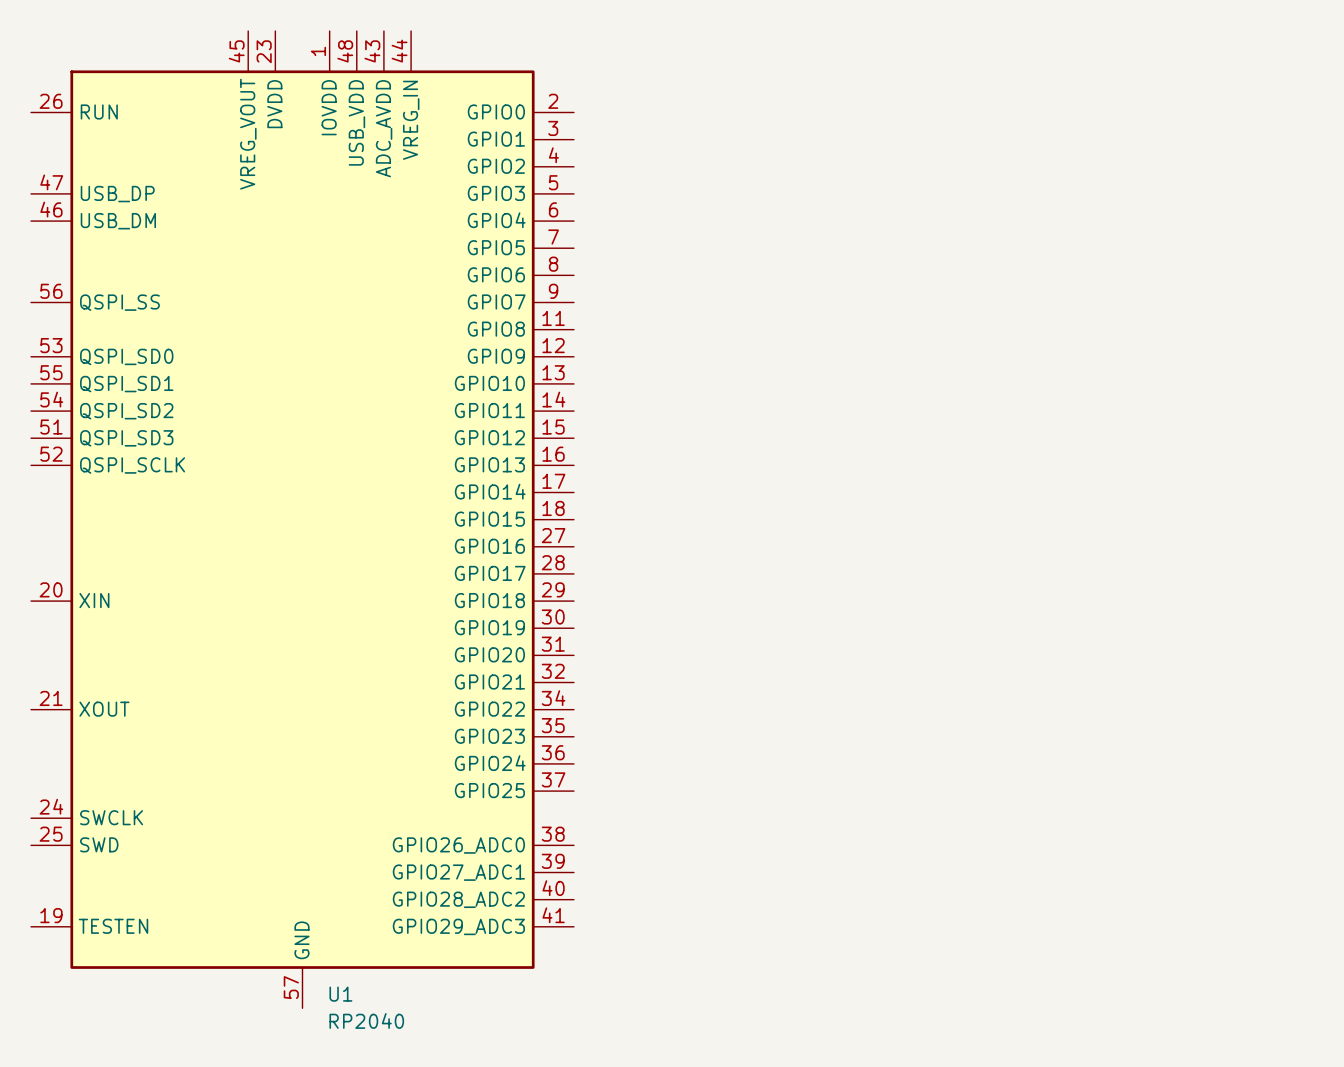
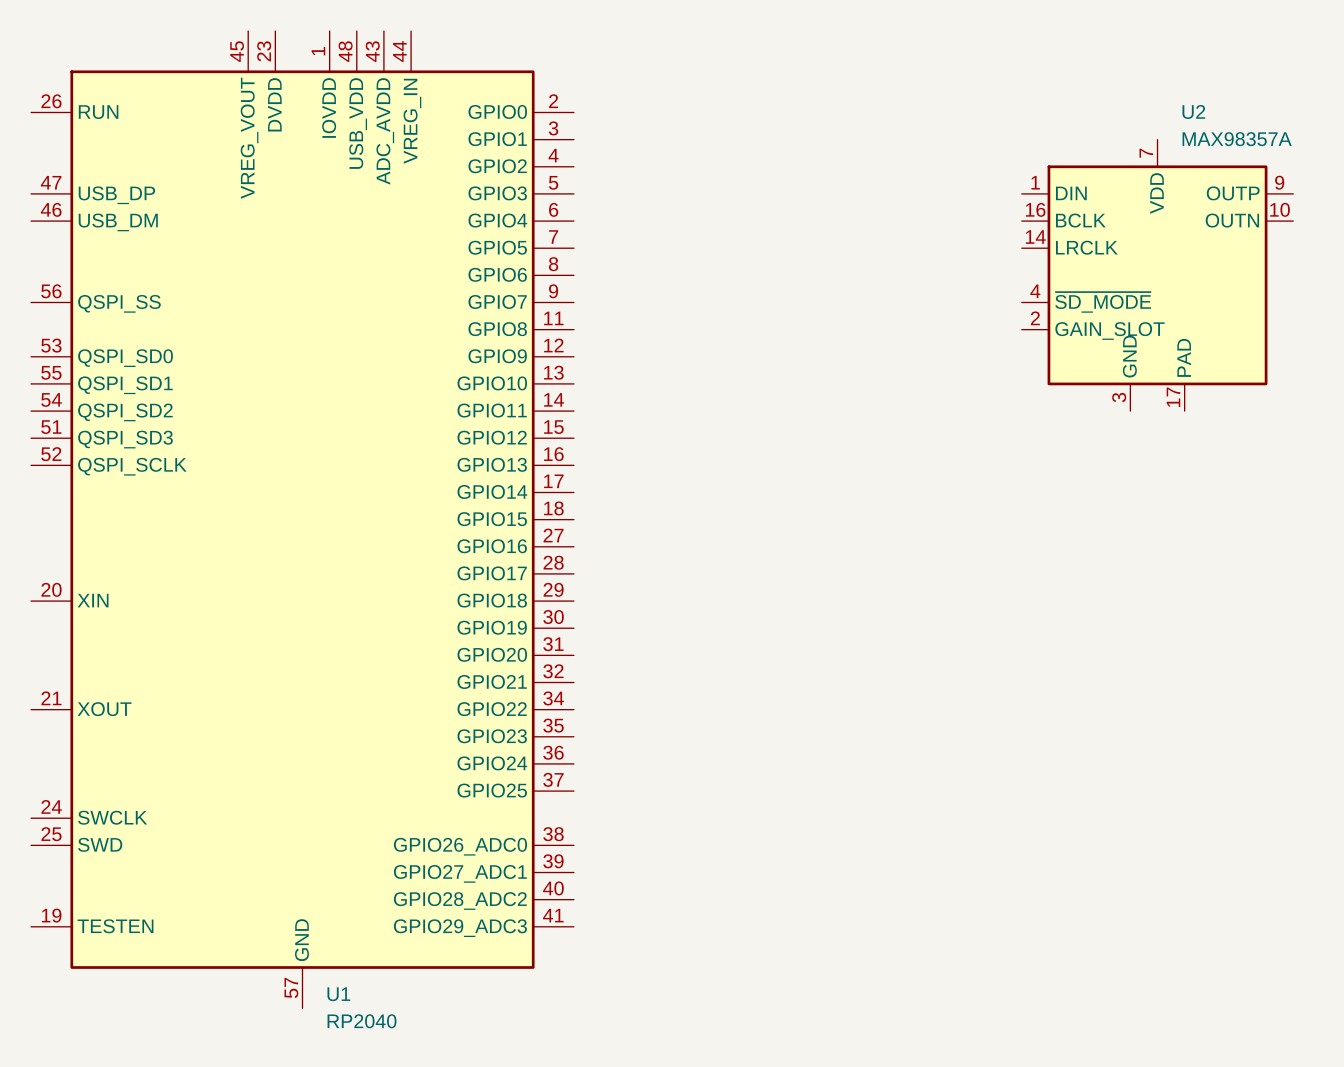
U2: none -> MAX98357A (1157, 275)

